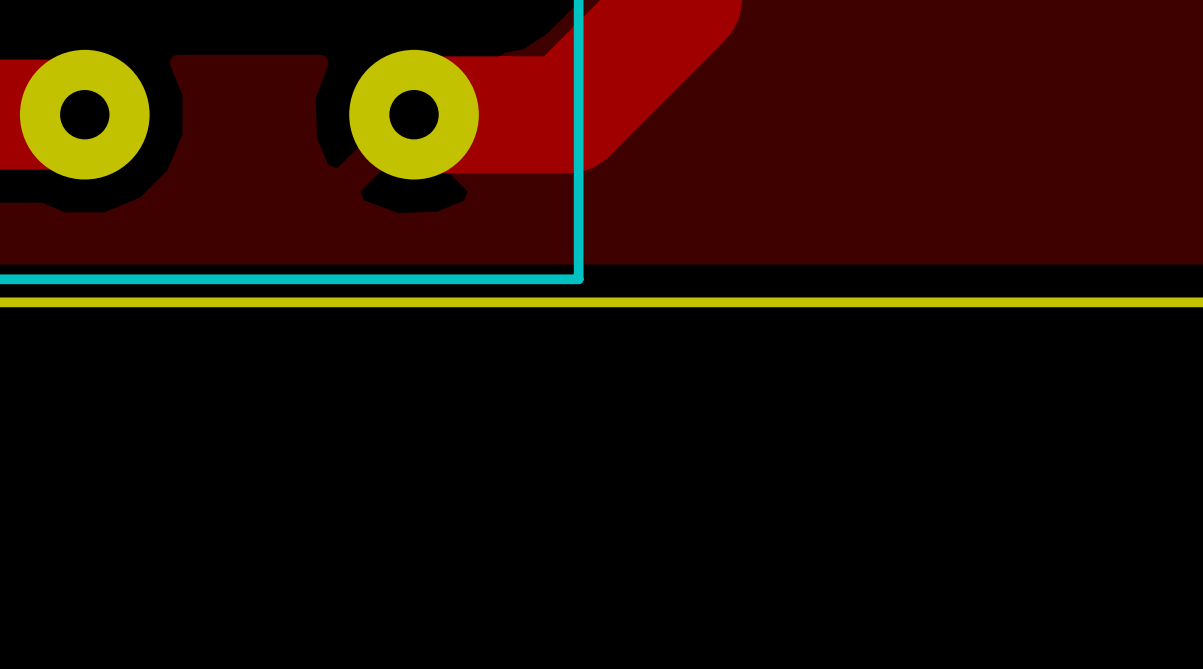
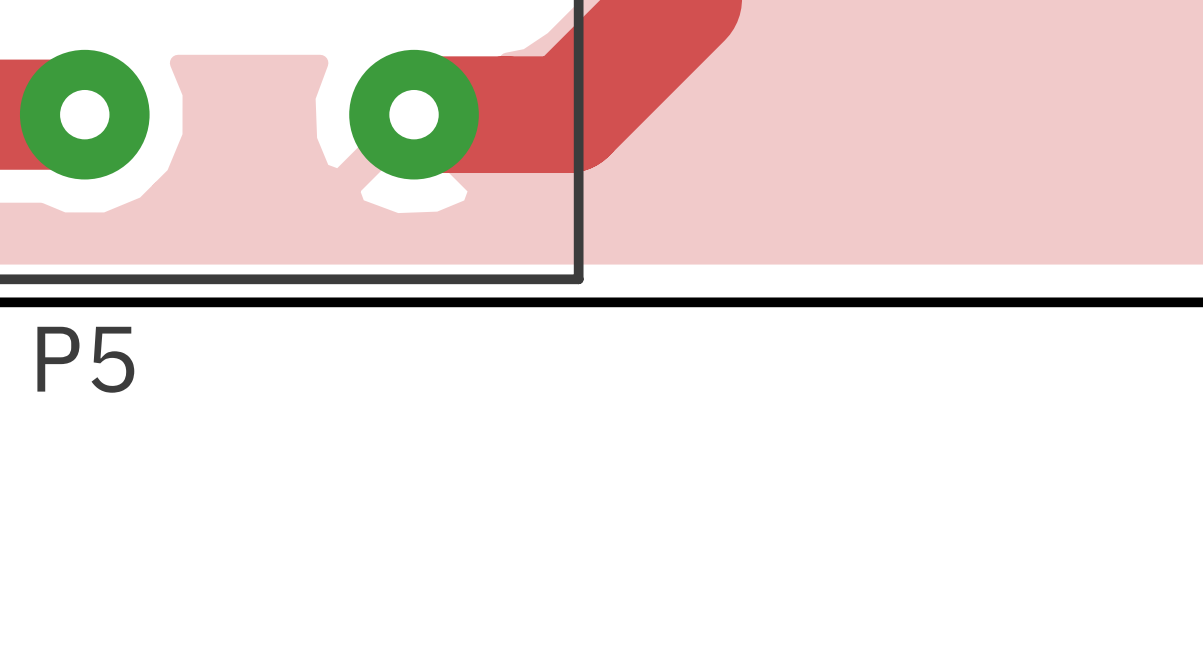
P5 name: none -> P5 (85, 359)

